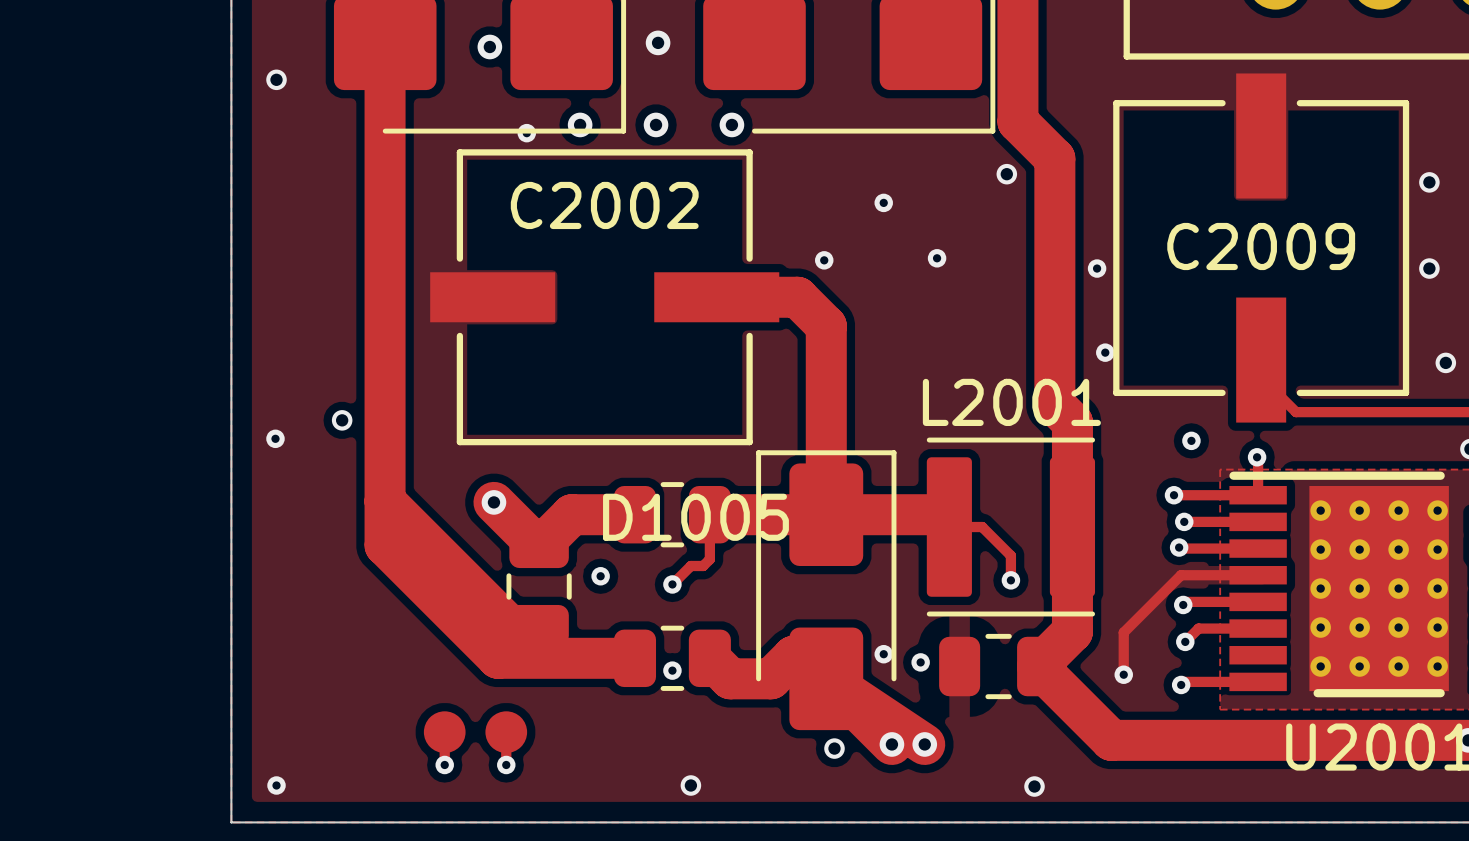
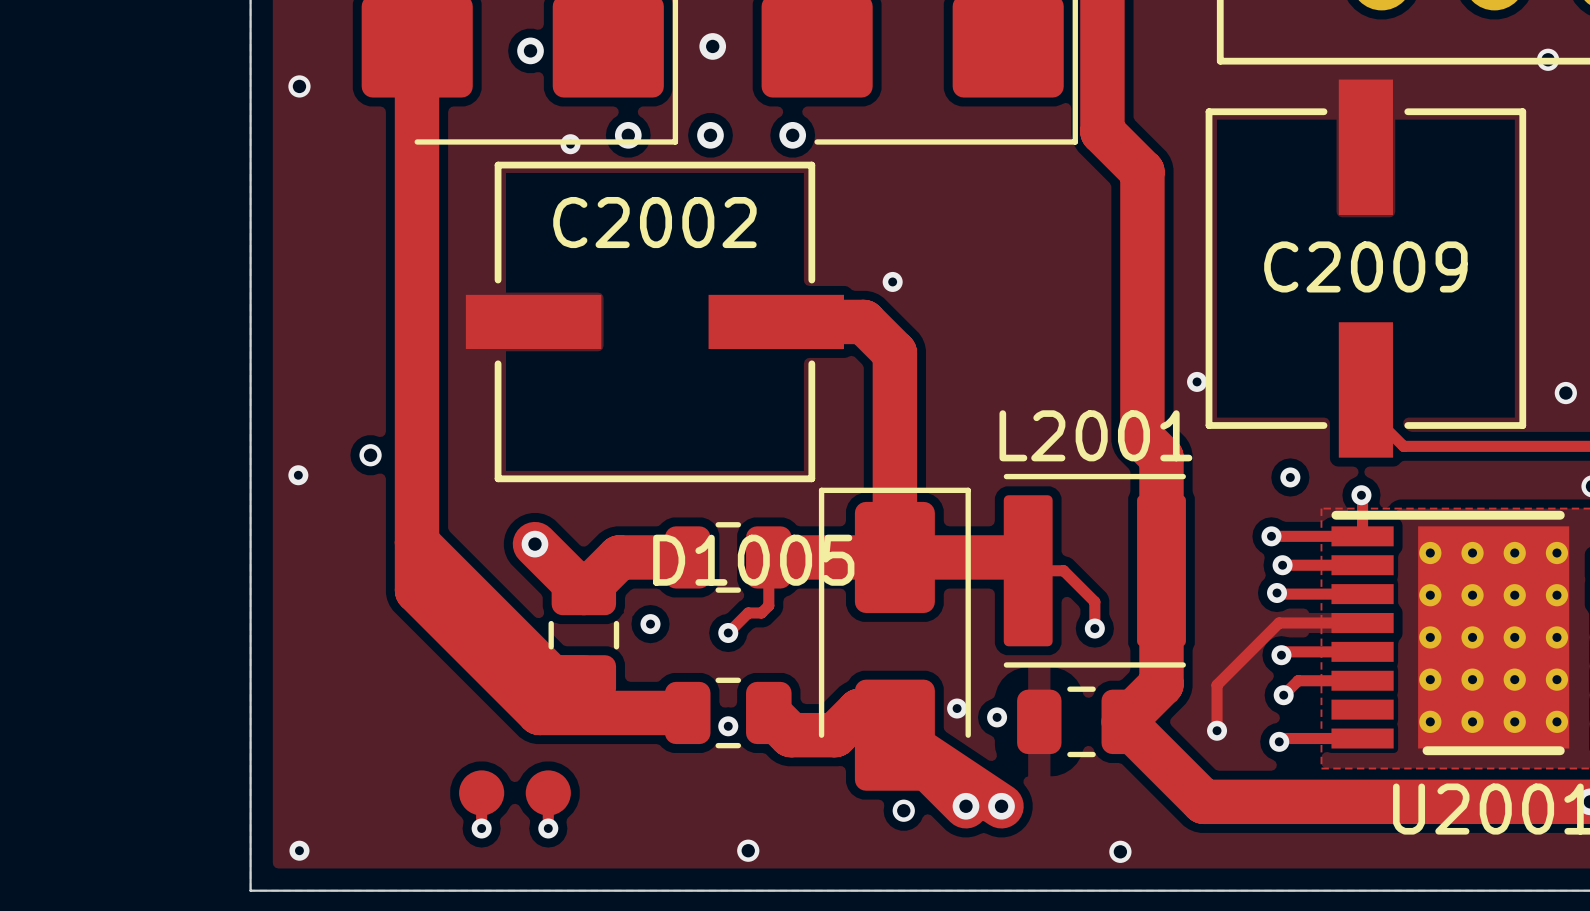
via: none -> (1548, 59)
via: (1006, 174) -> none
via: (1429, 182) -> none
via: (883, 202) -> none
via: (937, 258) -> none
via: (1097, 268) -> none
via: (1429, 268) -> none

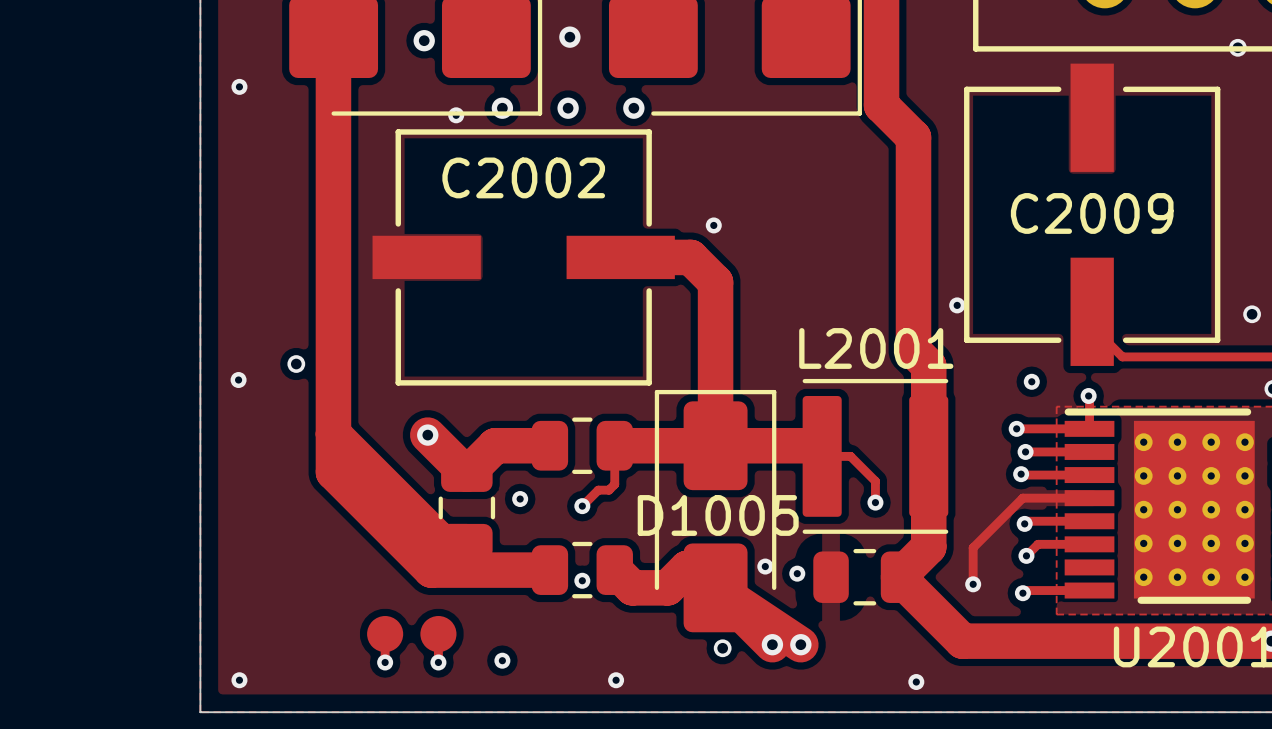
via: (299, 86) -> none
via: none -> (239, 86)
D1005 name position: D1005 (753, 560) -> D1005 (718, 515)
via: none -> (502, 660)
via: (748, 850) -> none
via: none -> (616, 680)
via: (1120, 851) -> none
via: none -> (916, 682)

